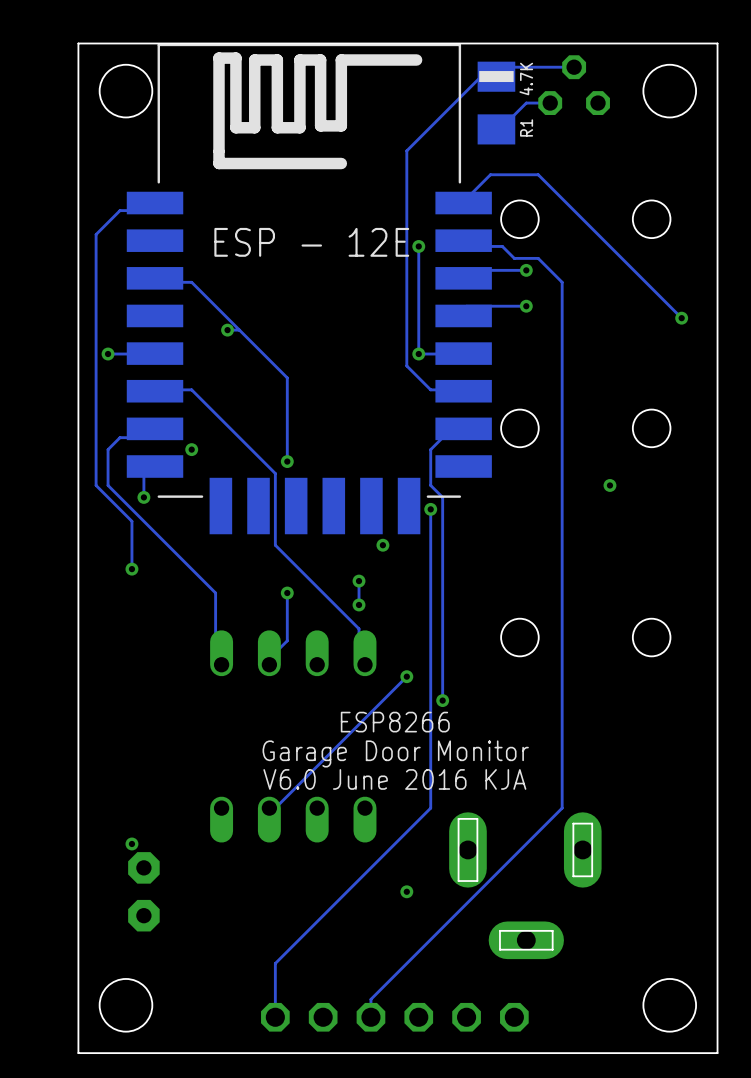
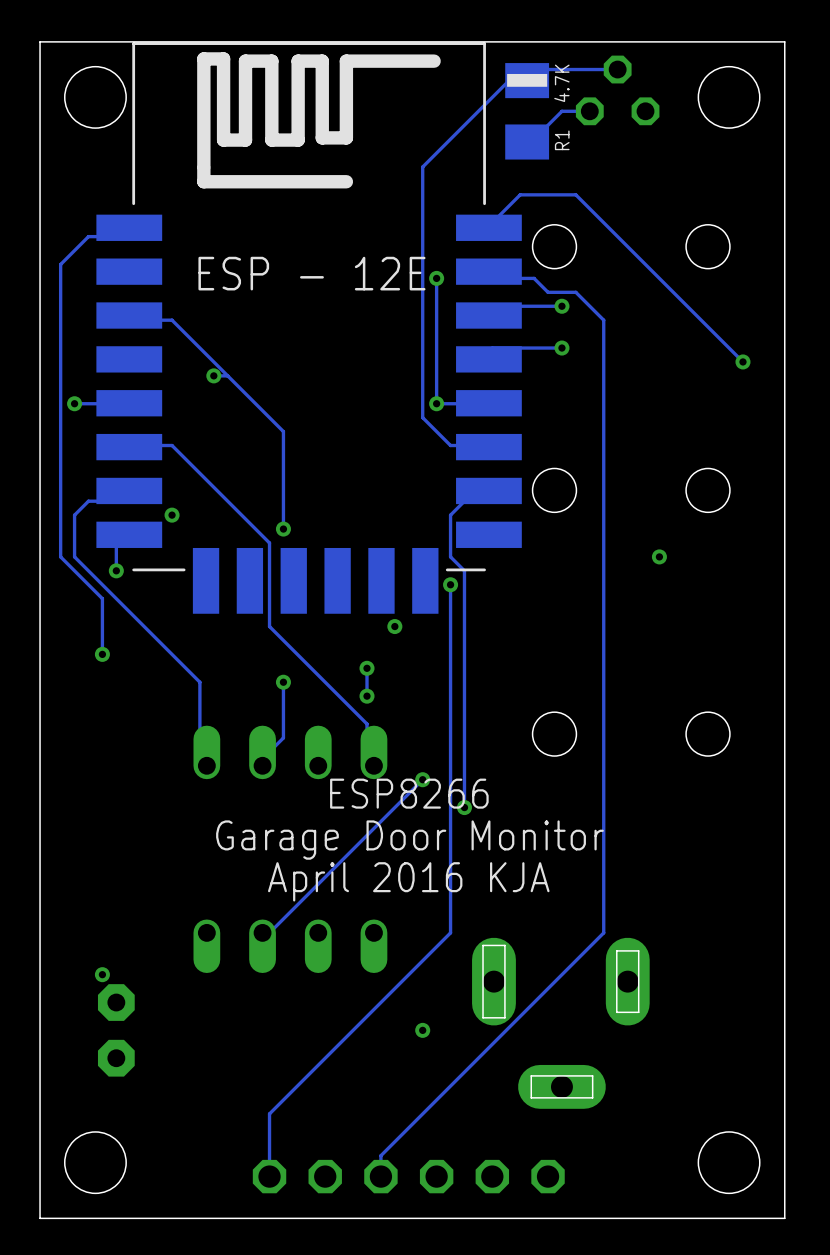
text: none -> ESP8266 (409, 793)
text: ESP8266 (395, 722) -> Garage Door Monitor (409, 840)
text: Garage Door Monitor (395, 753) -> April 2016 KJA (408, 881)
text: V6.0 June 2016 KJA (394, 779) -> none

